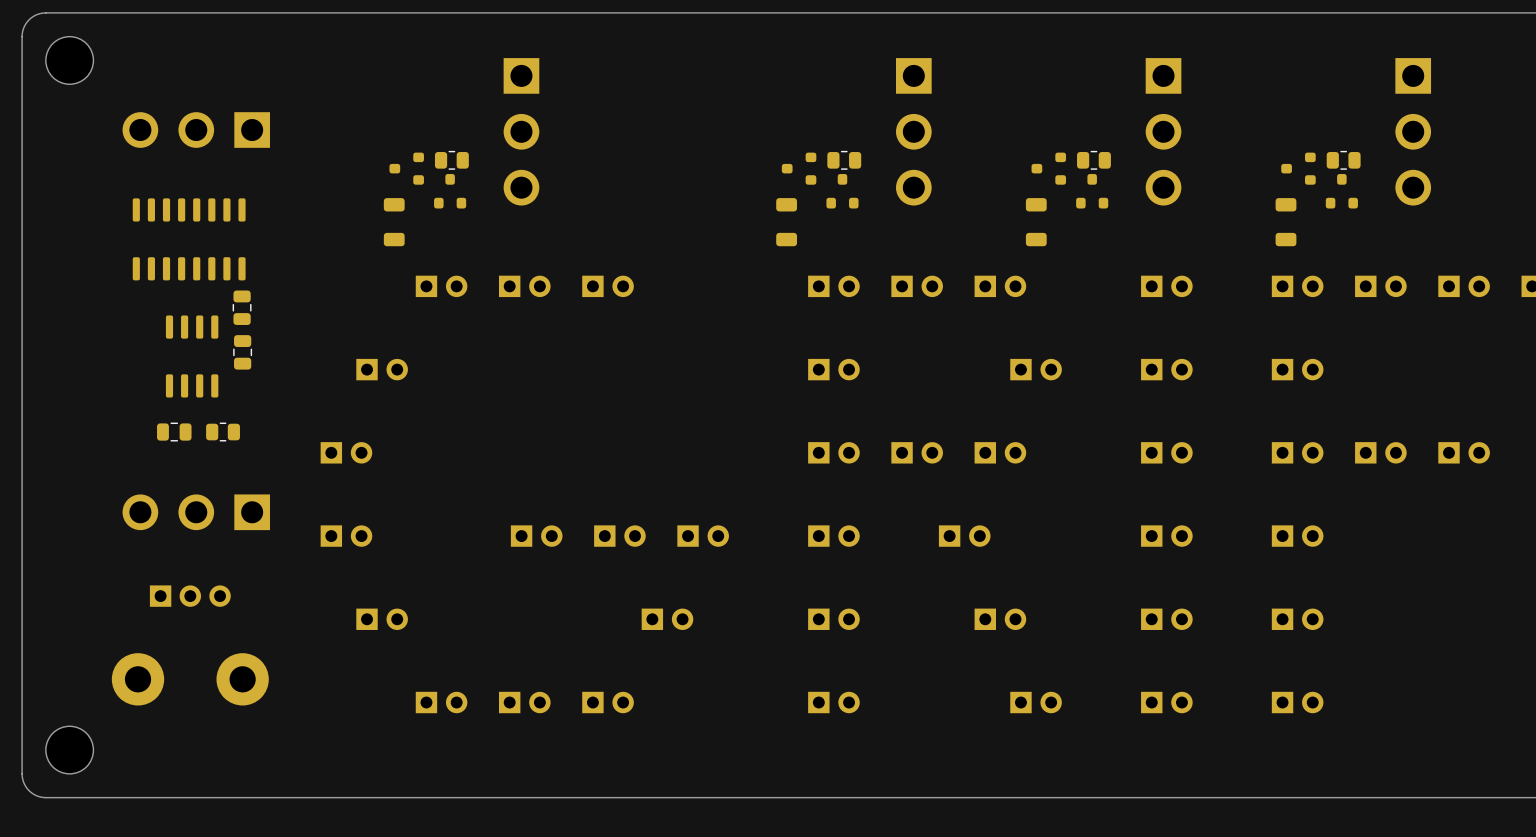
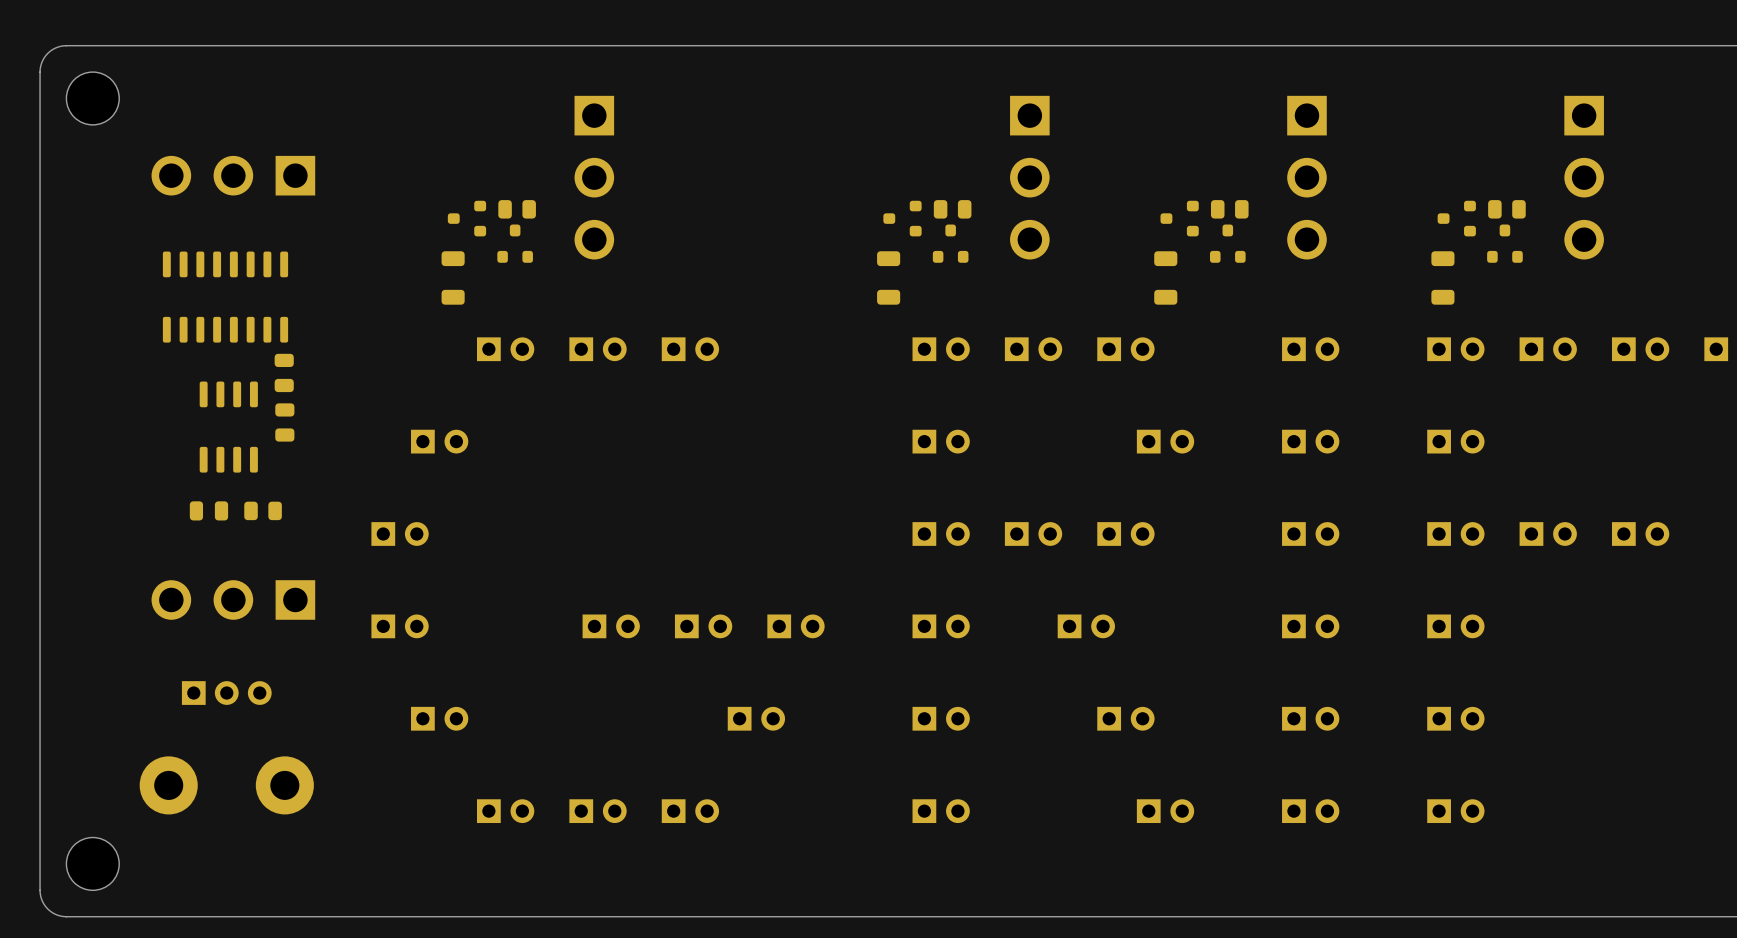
part footprint: [434, 150, 469, 170] -> [498, 200, 536, 219]
part footprint: [827, 150, 862, 170] -> [933, 200, 972, 219]
part footprint: [1077, 150, 1111, 170] -> [1210, 200, 1249, 219]
part footprint: [1326, 150, 1361, 170] -> [1488, 200, 1526, 219]
part footprint: [232, 290, 252, 325] -> [274, 353, 294, 393]
part footprint: [233, 335, 253, 370] -> [275, 403, 295, 442]
part footprint: [157, 422, 192, 442] -> [189, 501, 229, 521]
part footprint: [206, 422, 240, 442] -> [244, 501, 282, 521]

